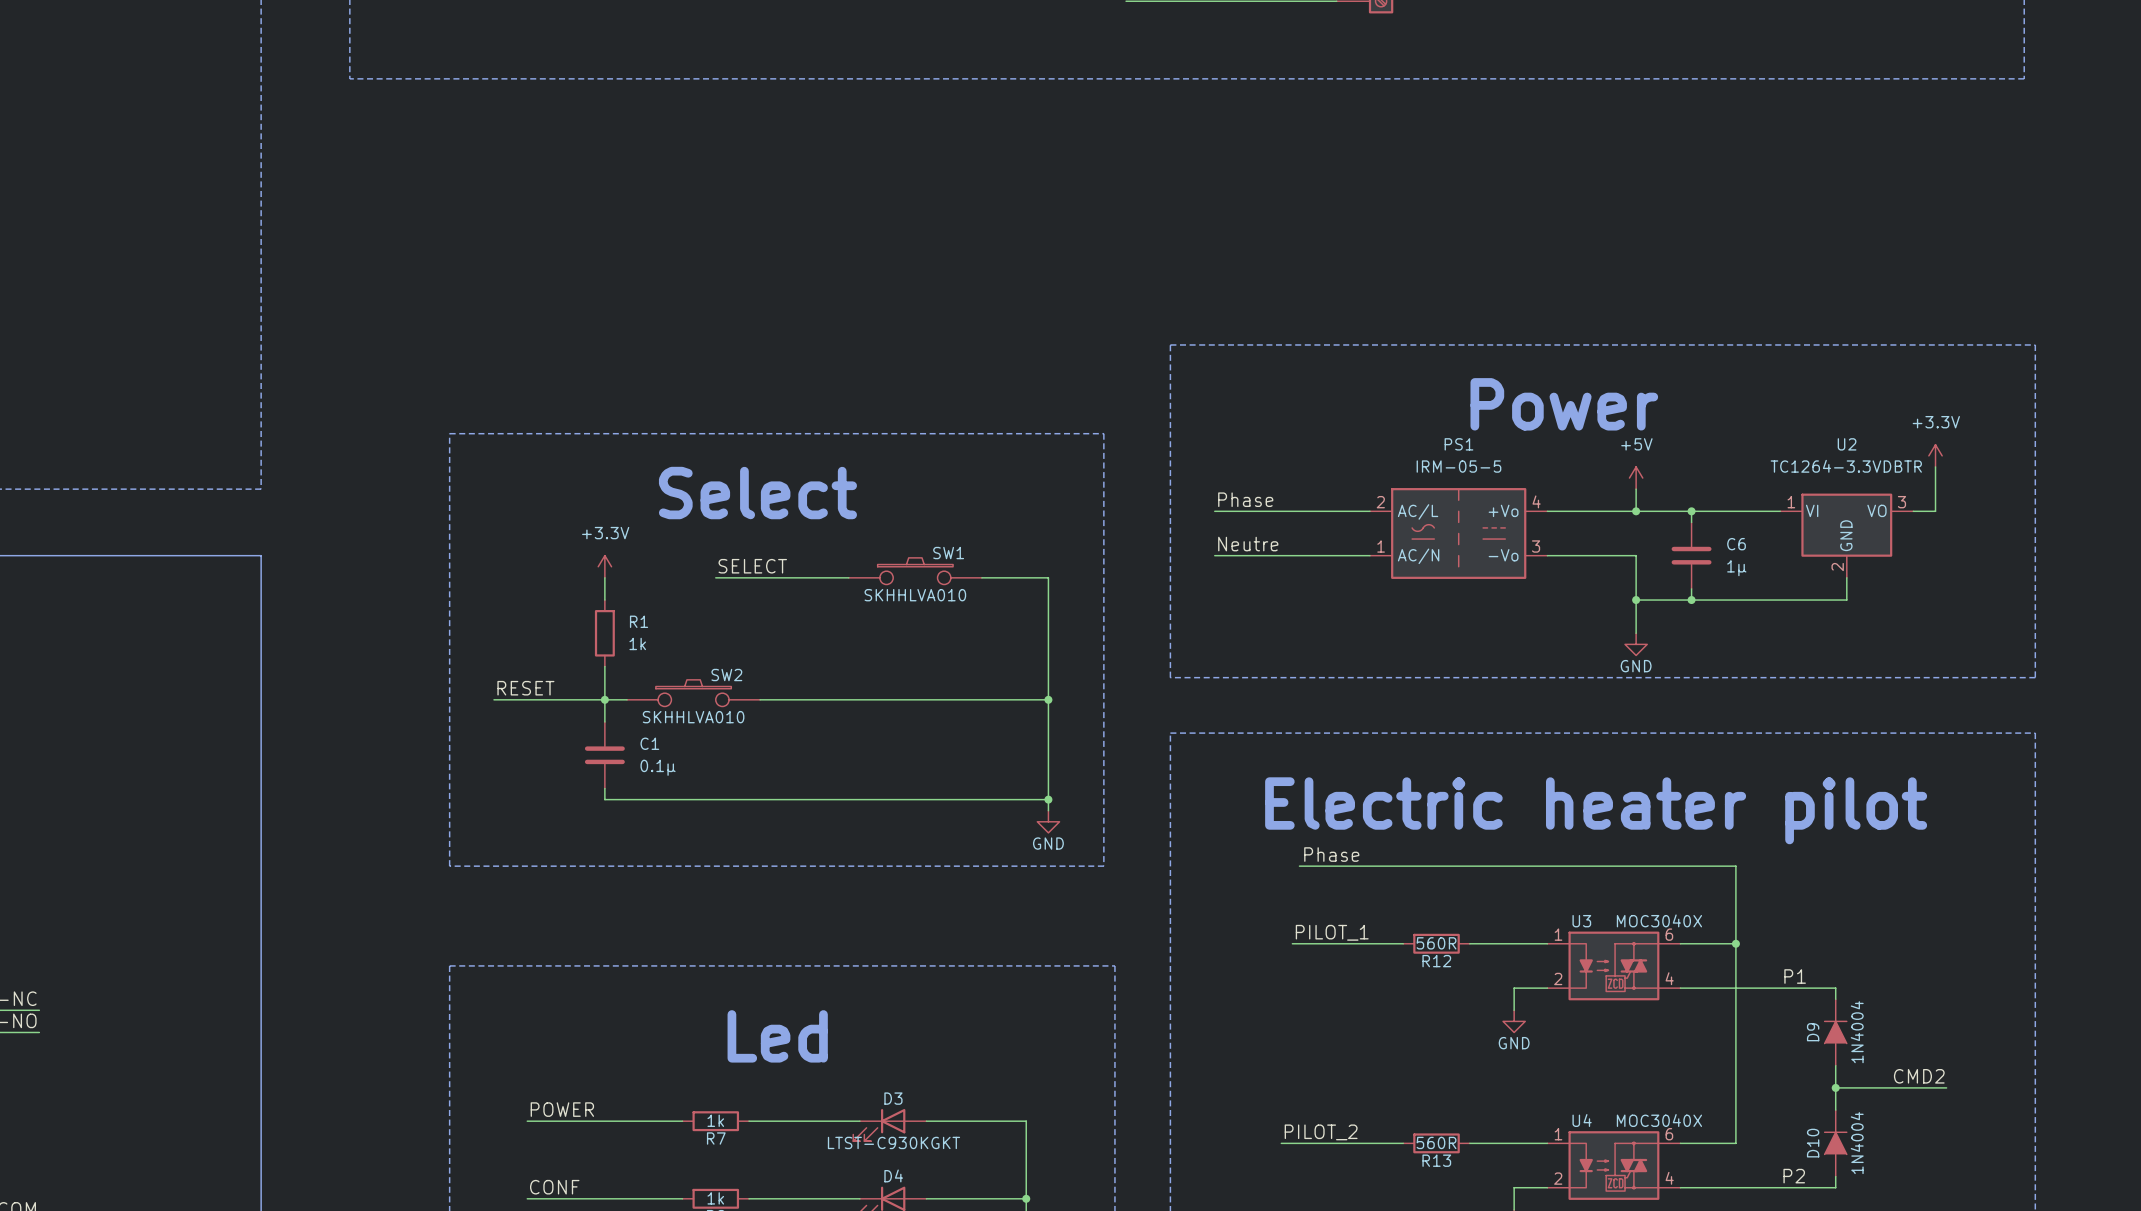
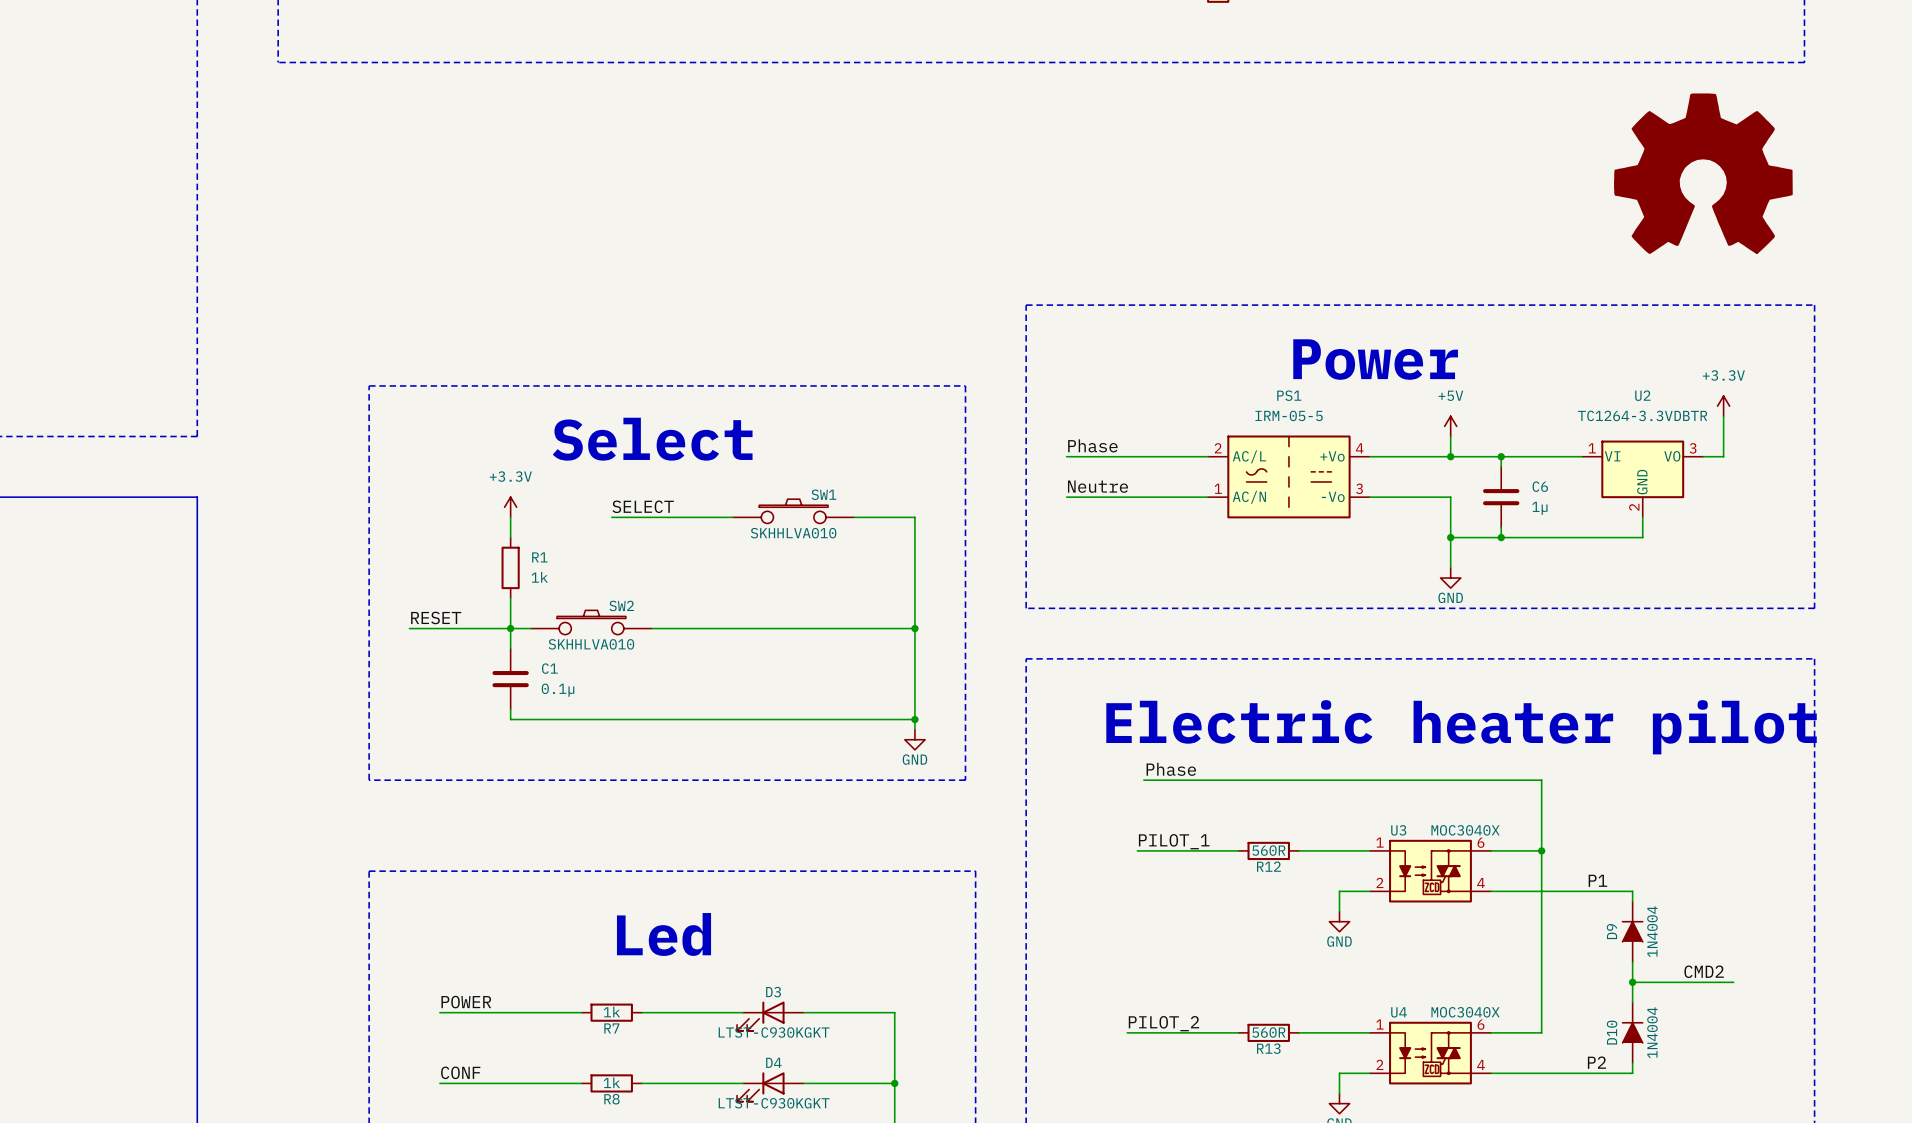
part: none -> (1703, 173)

